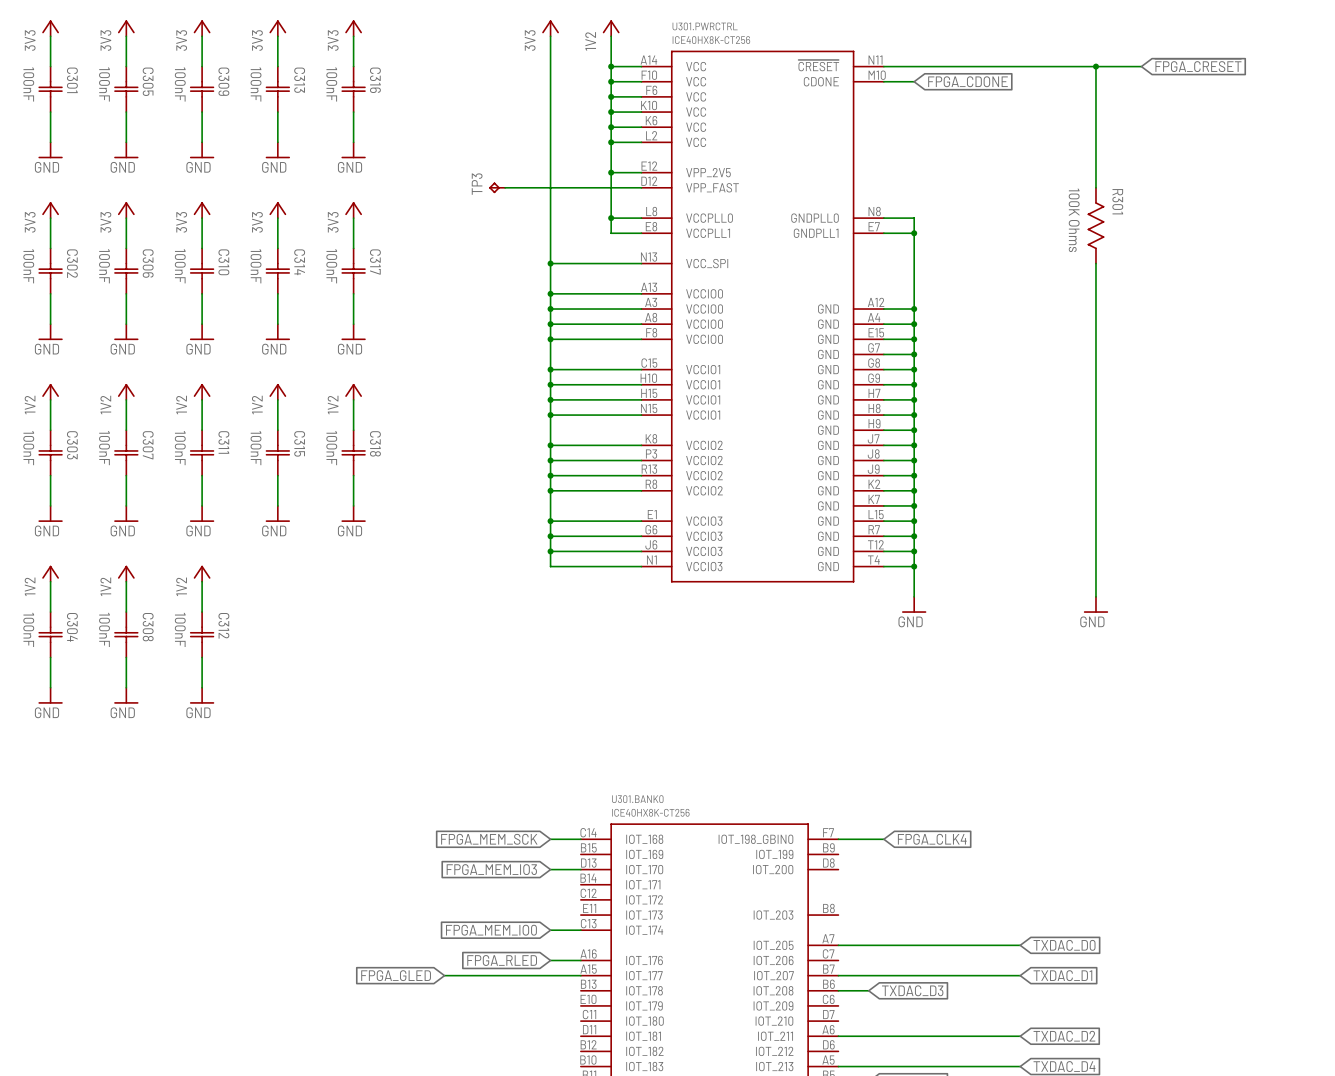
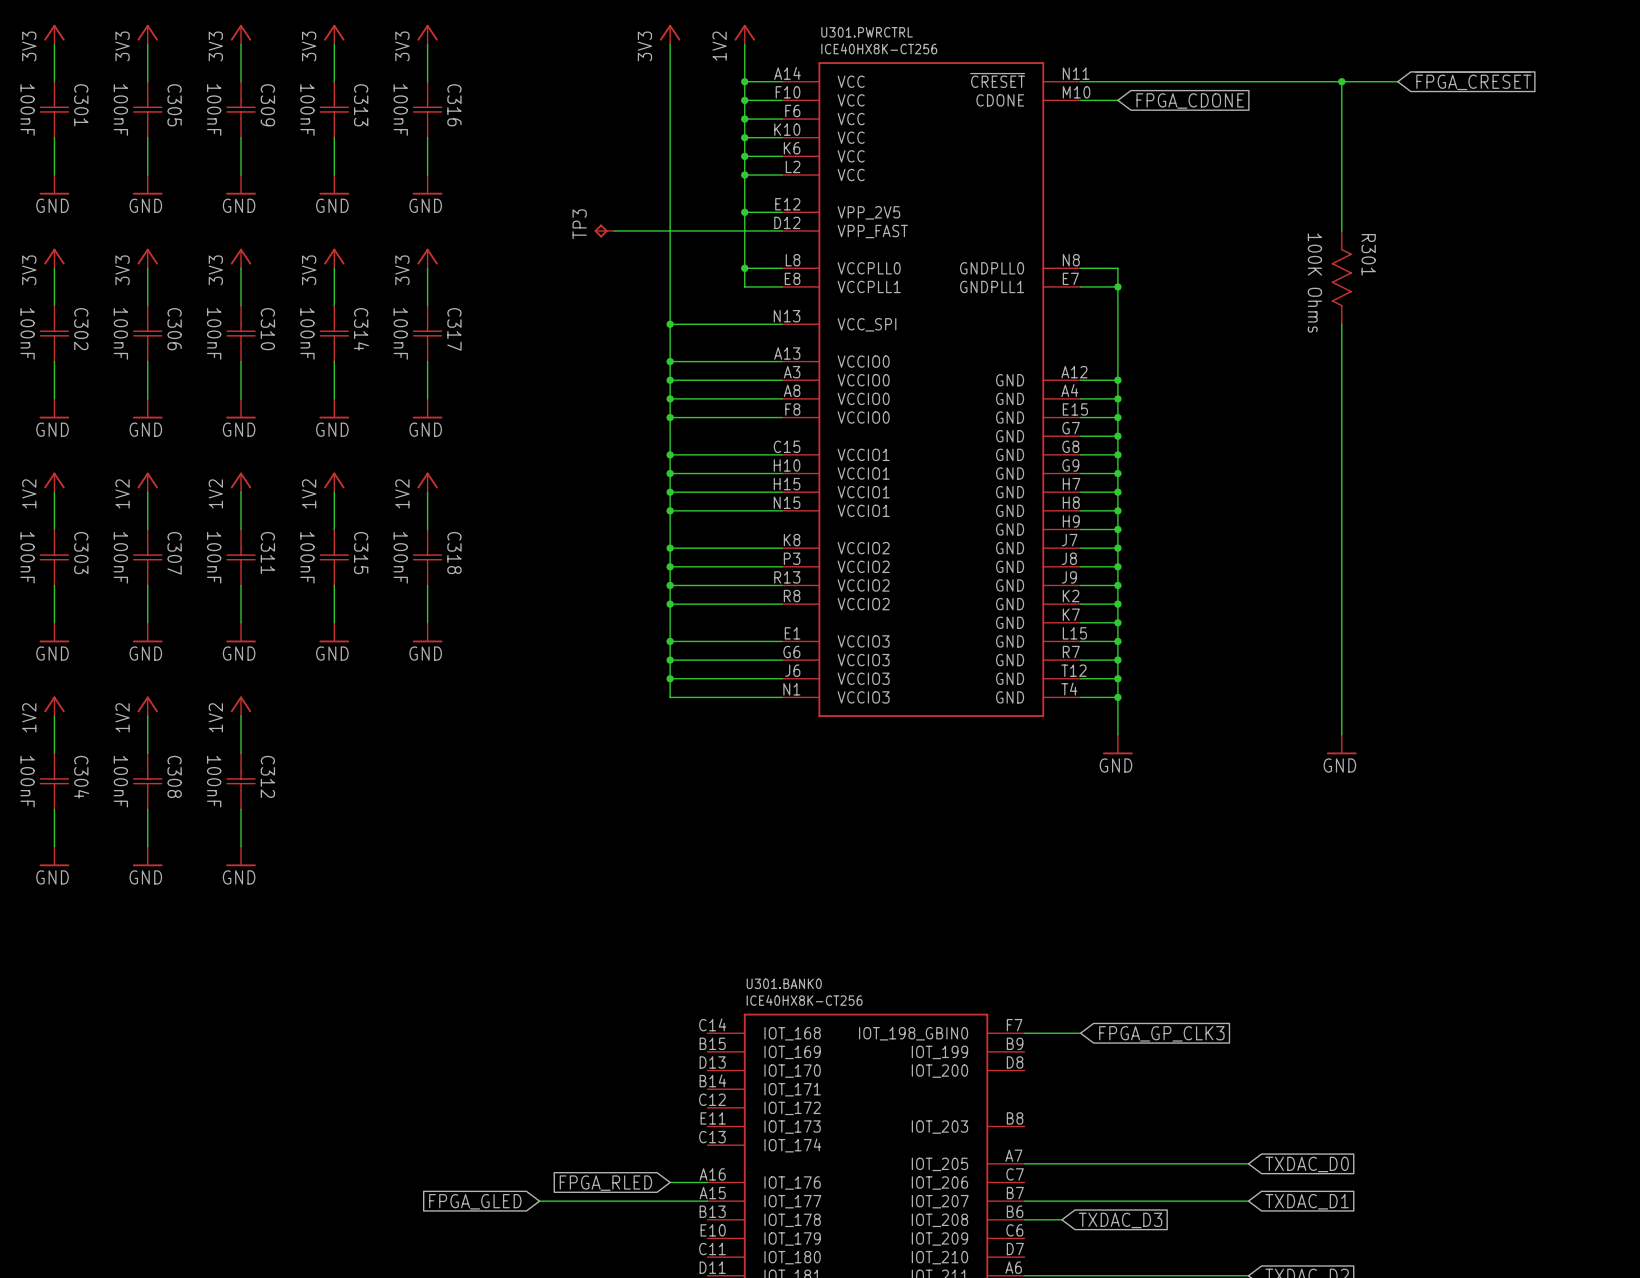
global label: FPGA_MEM_SCK (489, 839) -> none
wire: (550, 839) (580, 839) -> none
global label: FPGA_CLK4 (932, 839) -> FPGA_GP_CLK3 (1161, 1033)
global label: FPGA_MEM_IO3 (491, 869) -> none
wire: (550, 869) (580, 869) -> none
global label: FPGA_MEM_IO0 (491, 930) -> none
wire: (550, 930) (580, 930) -> none

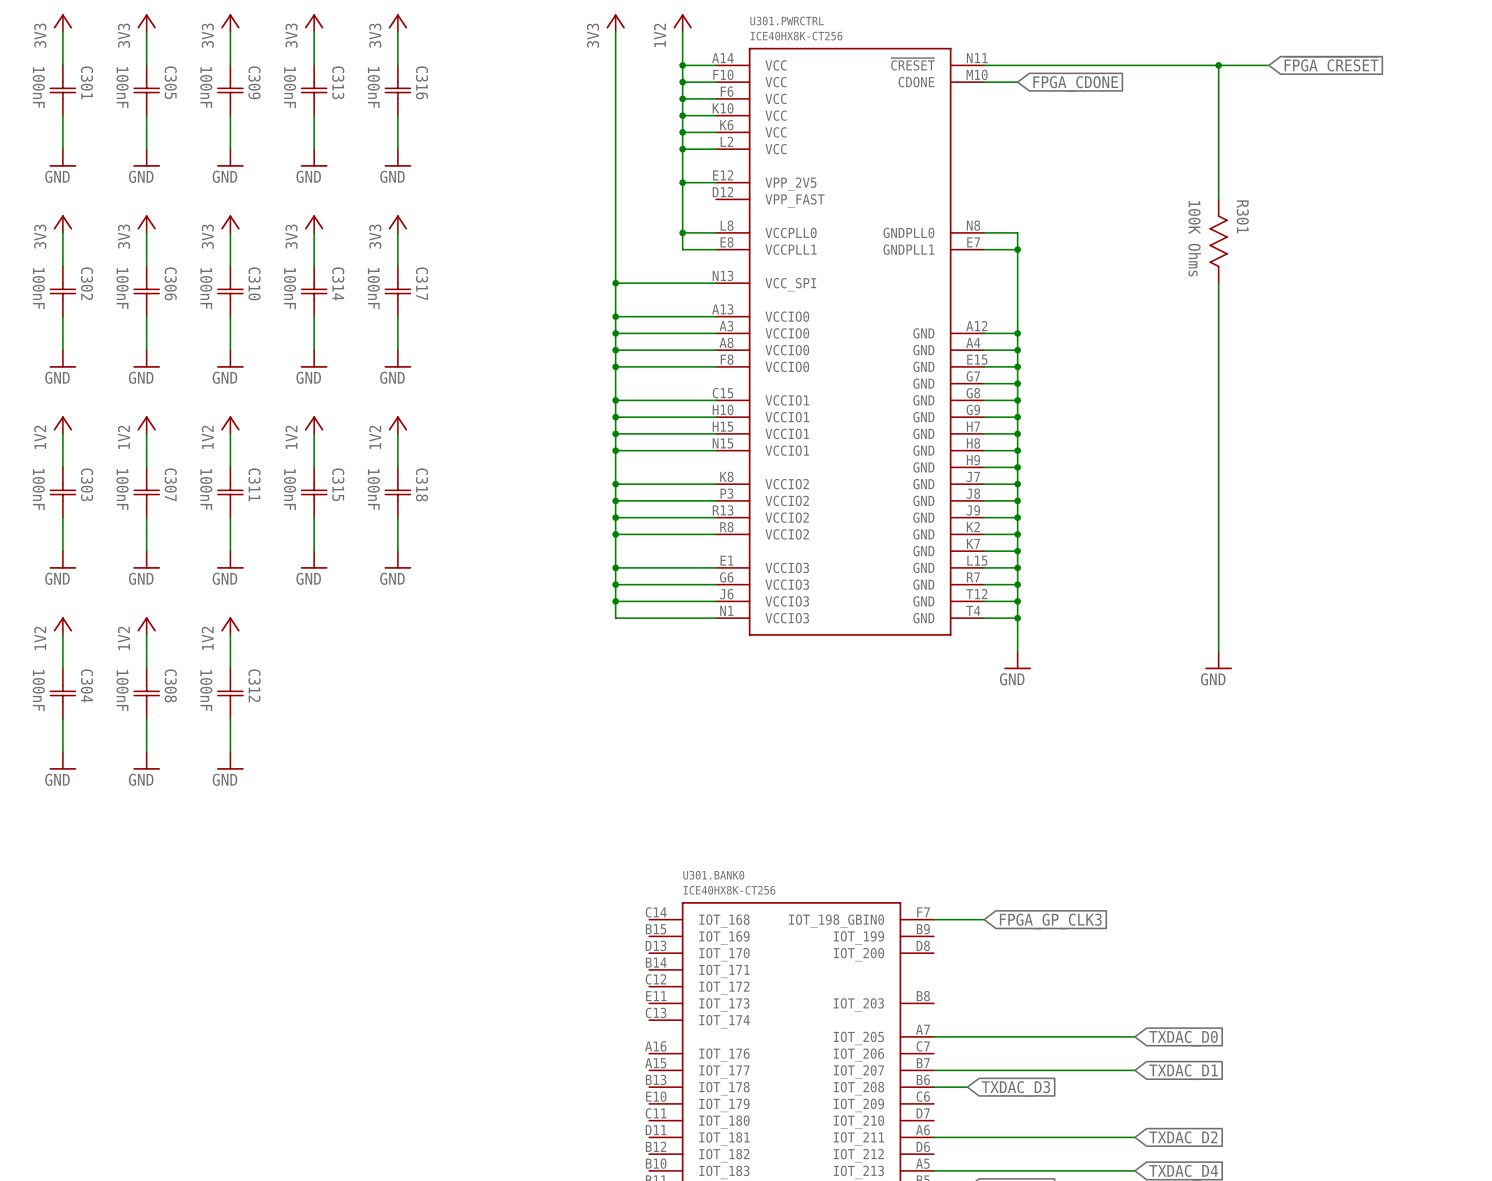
TP3: (604, 230) -> none
wire: (614, 230) (782, 230) -> none
wire: (670, 1182) (707, 1182) -> none
global label: FPGA_RLED (605, 1183) -> none
global label: FPGA_GLED (475, 1201) -> none
wire: (539, 1201) (707, 1201) -> none

